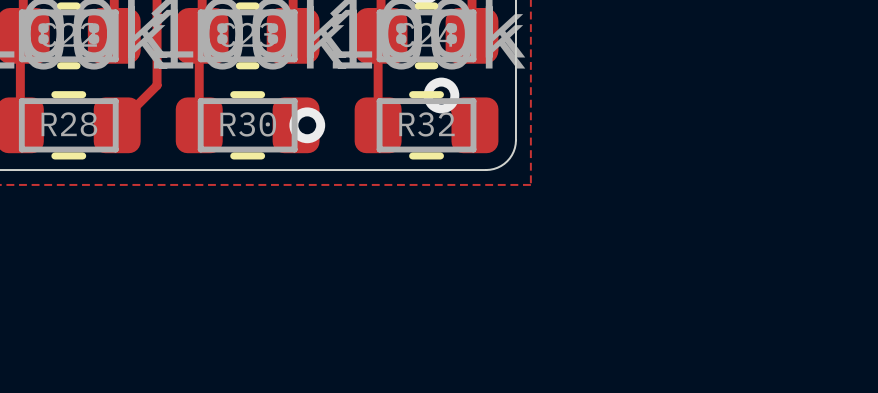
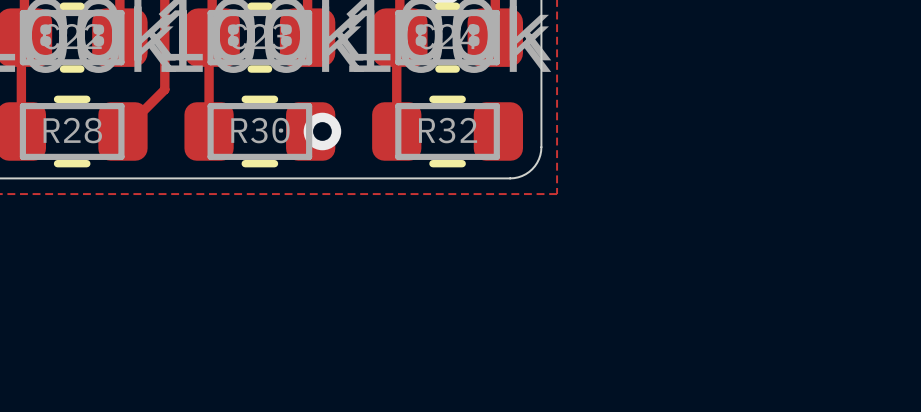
via: (441, 95) -> none

